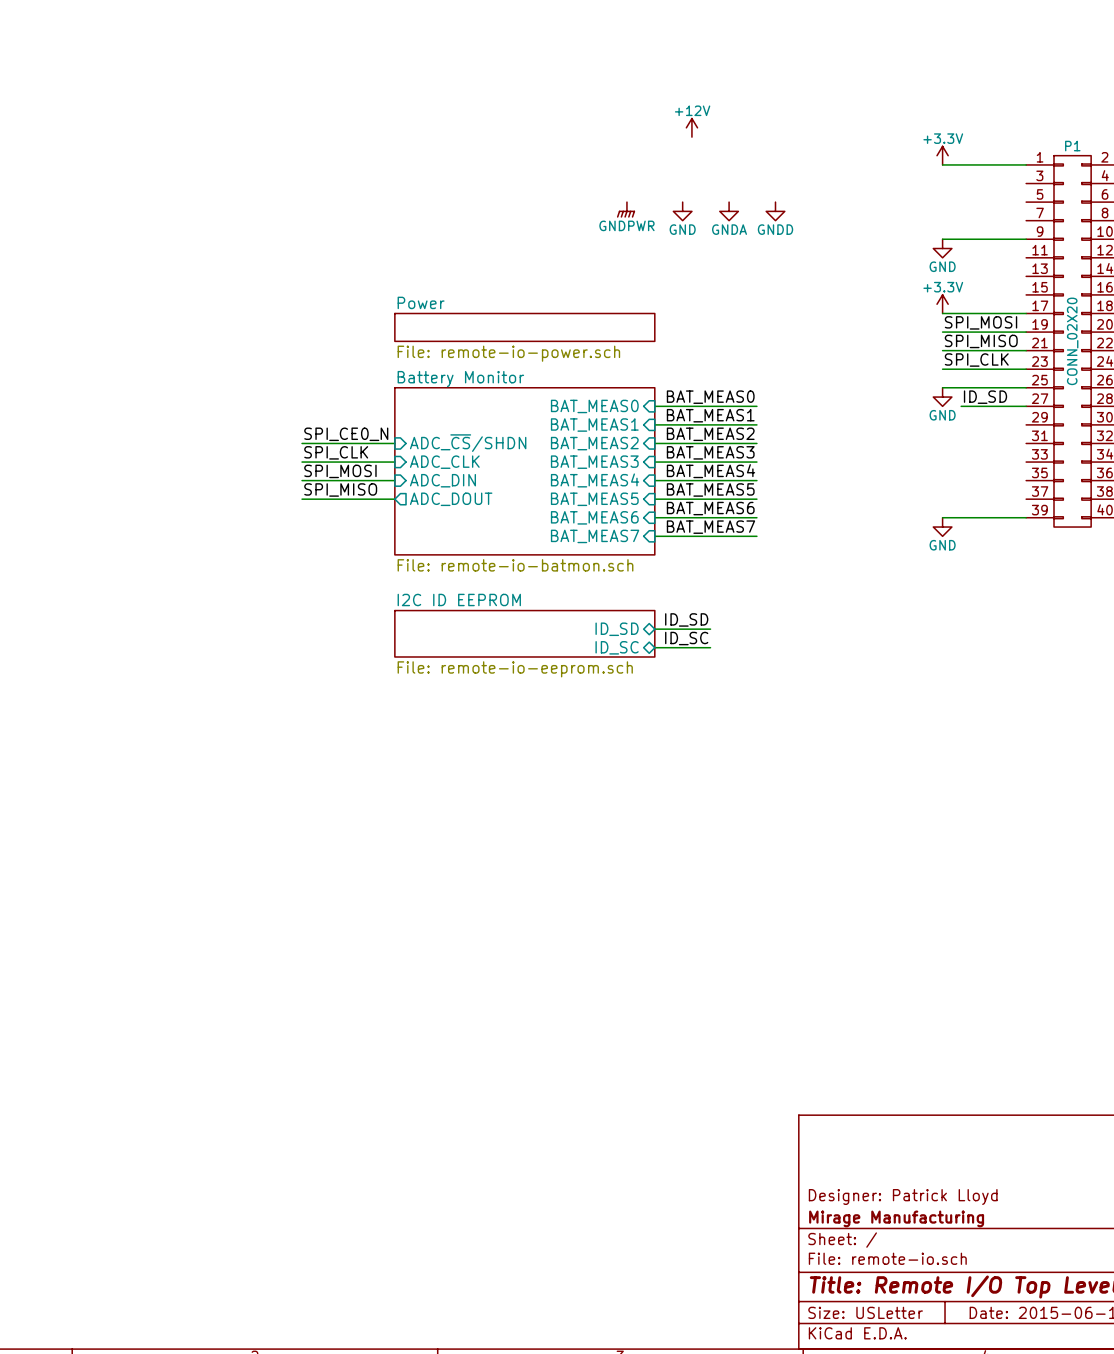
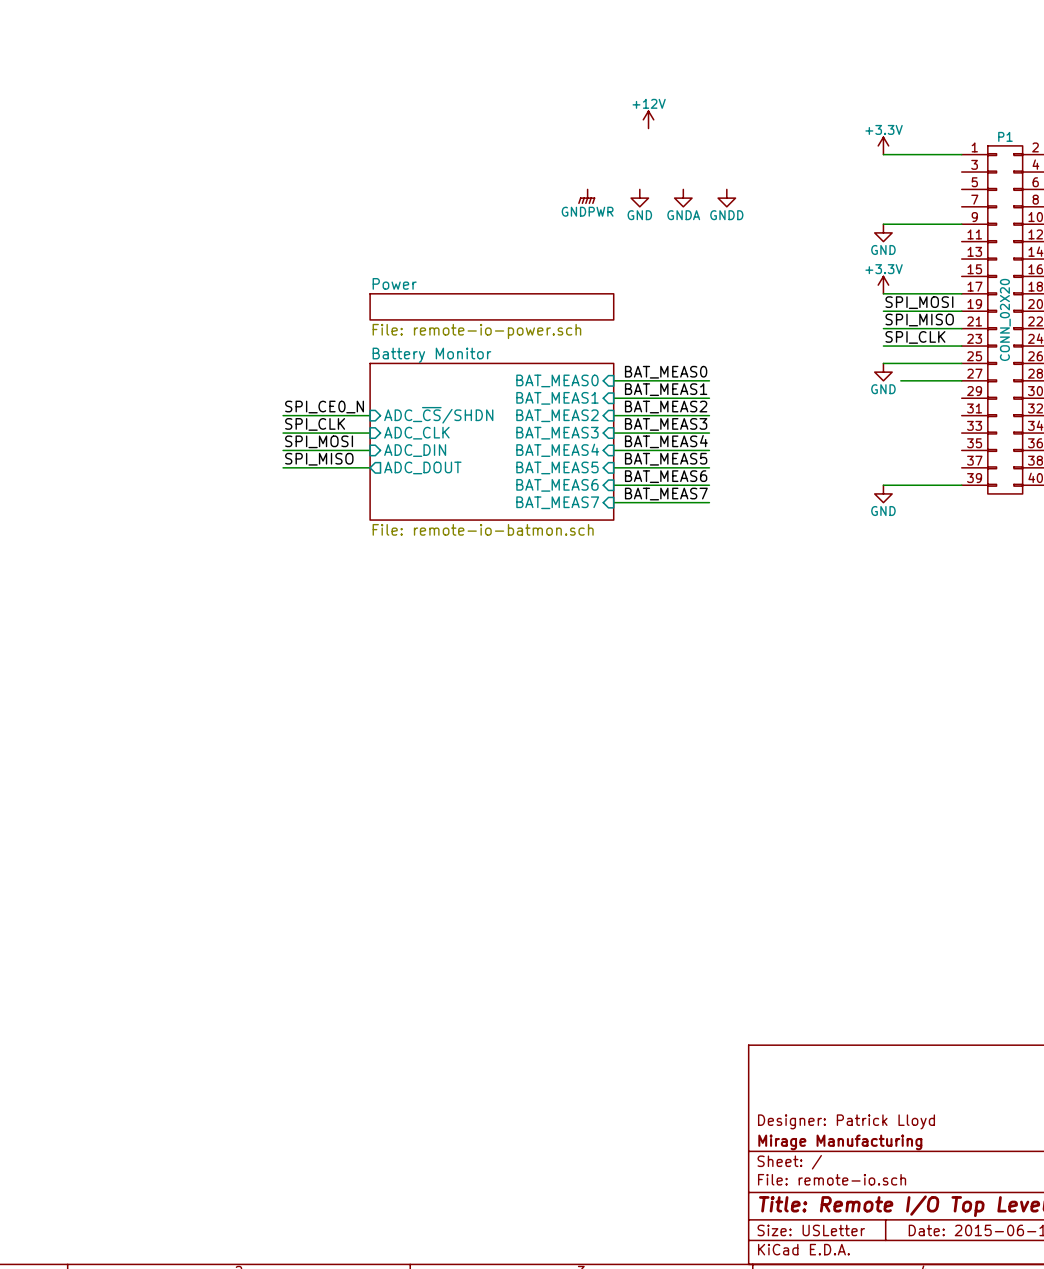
label: ID_SD (985, 397) -> none
label: ID_SD (686, 619) -> none
sheet pin: ID_SD (617, 629) -> none
wire: (654, 629) (710, 629) -> none
sheet I2C ID EEPROM: File: remote-io-eeprom.sch (524, 633) -> none
label: ID_SC (686, 638) -> none
sheet pin: ID_SC (617, 647) -> none
wire: (654, 647) (710, 647) -> none

